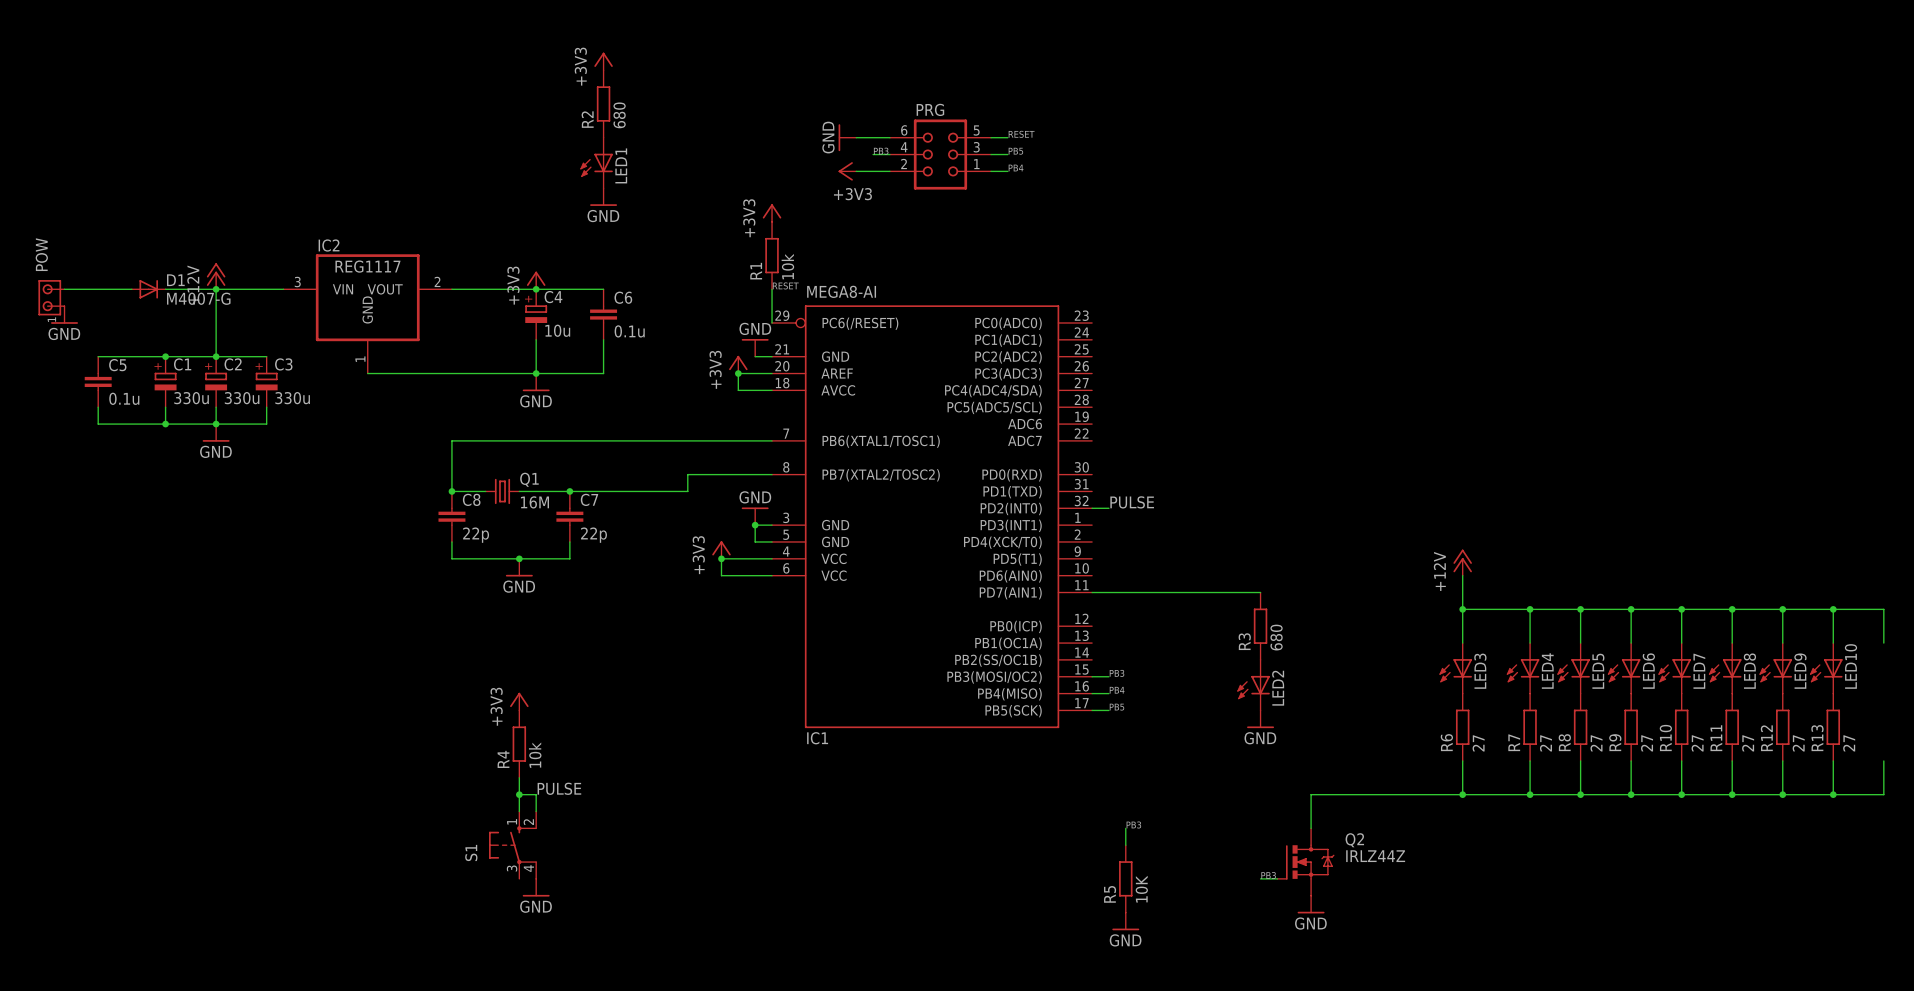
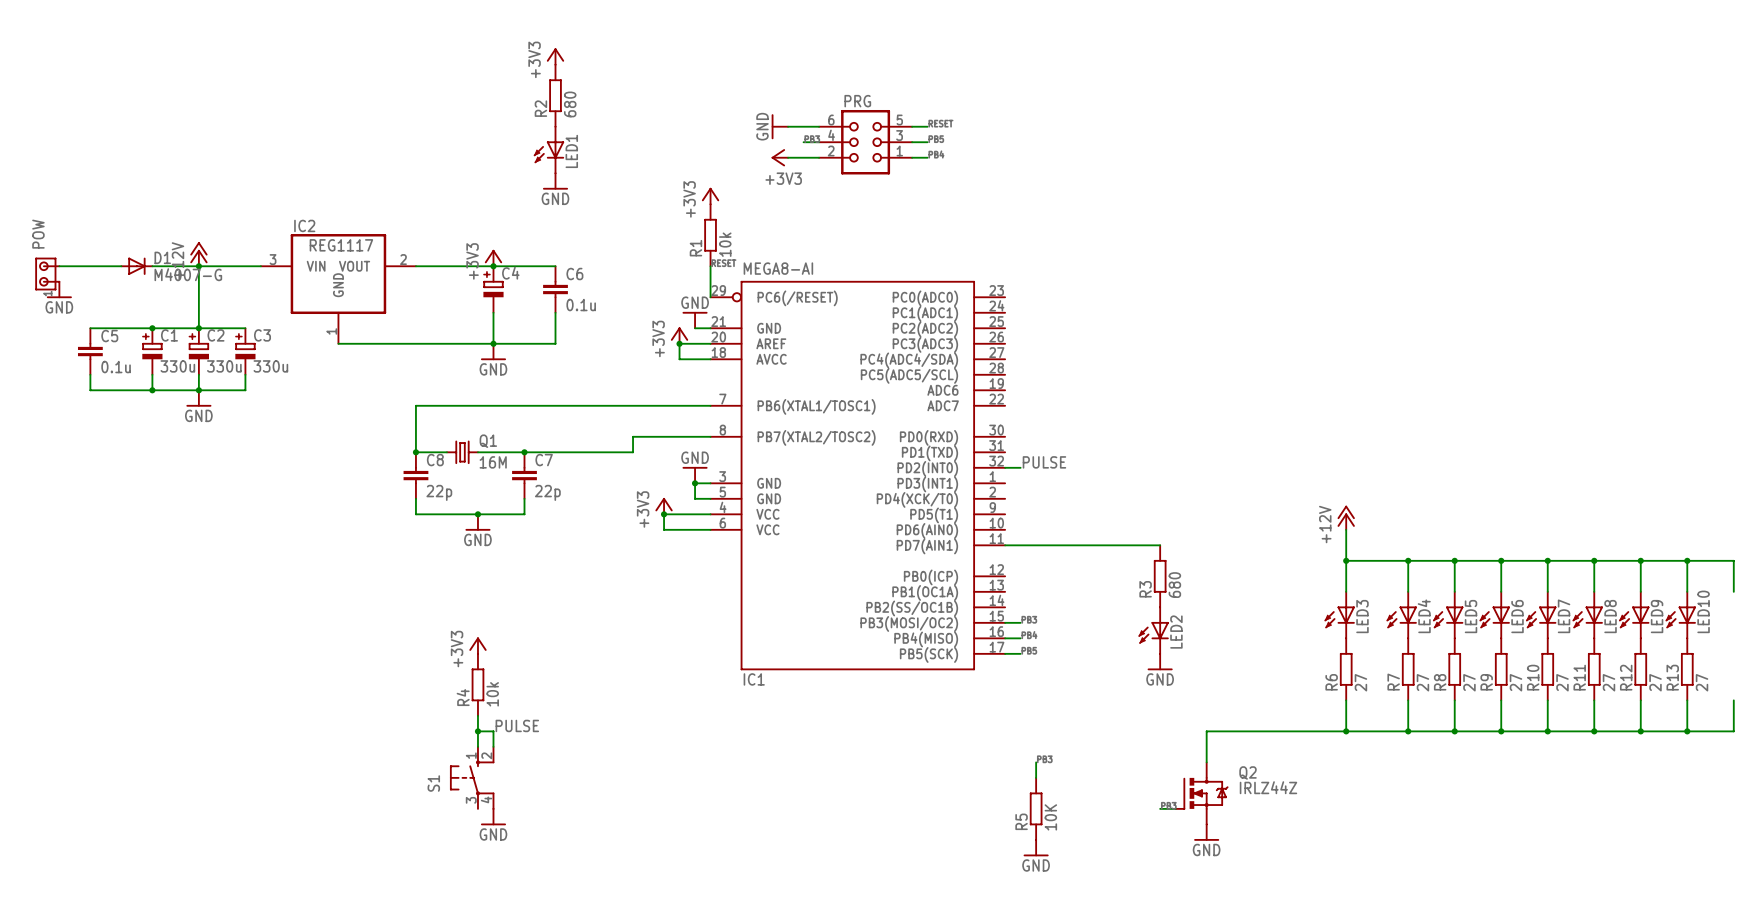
C4 value: 10u (557, 330) -> none

